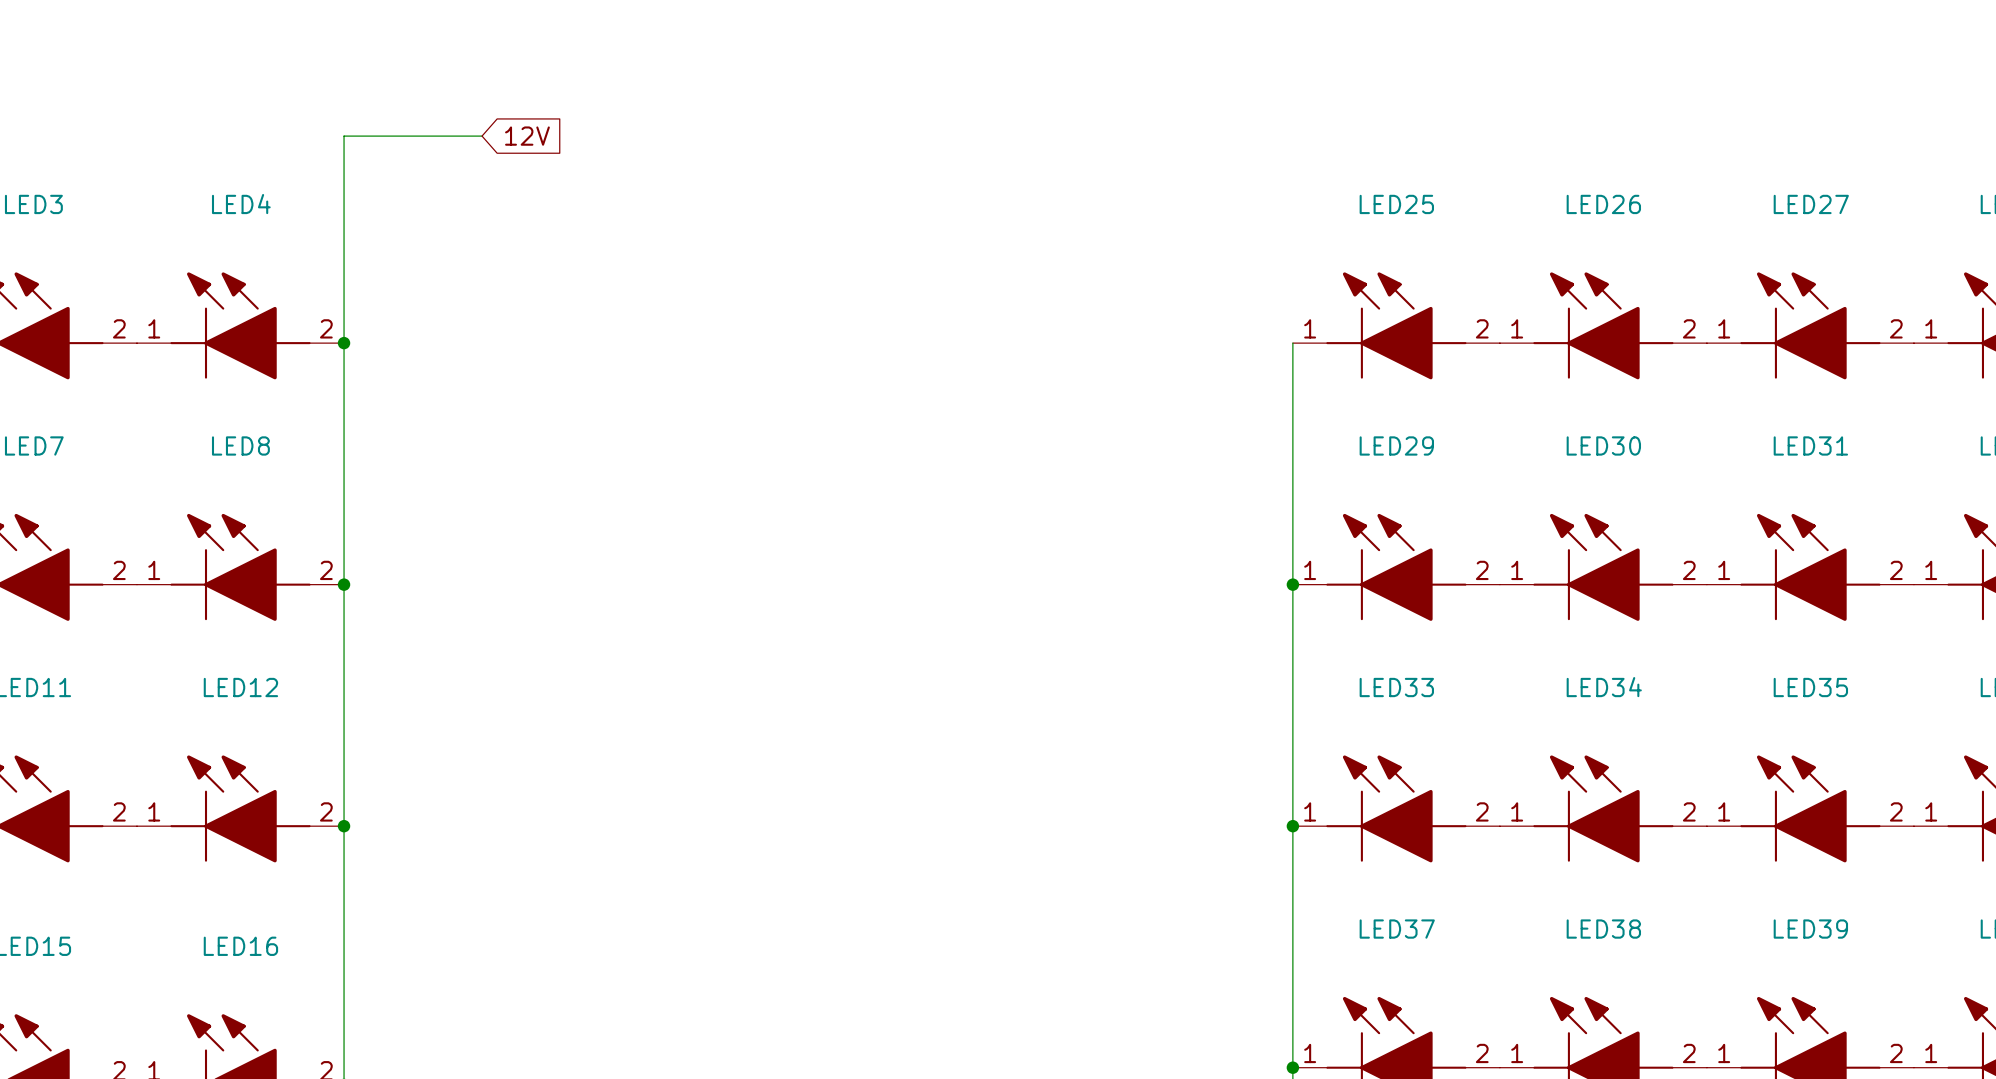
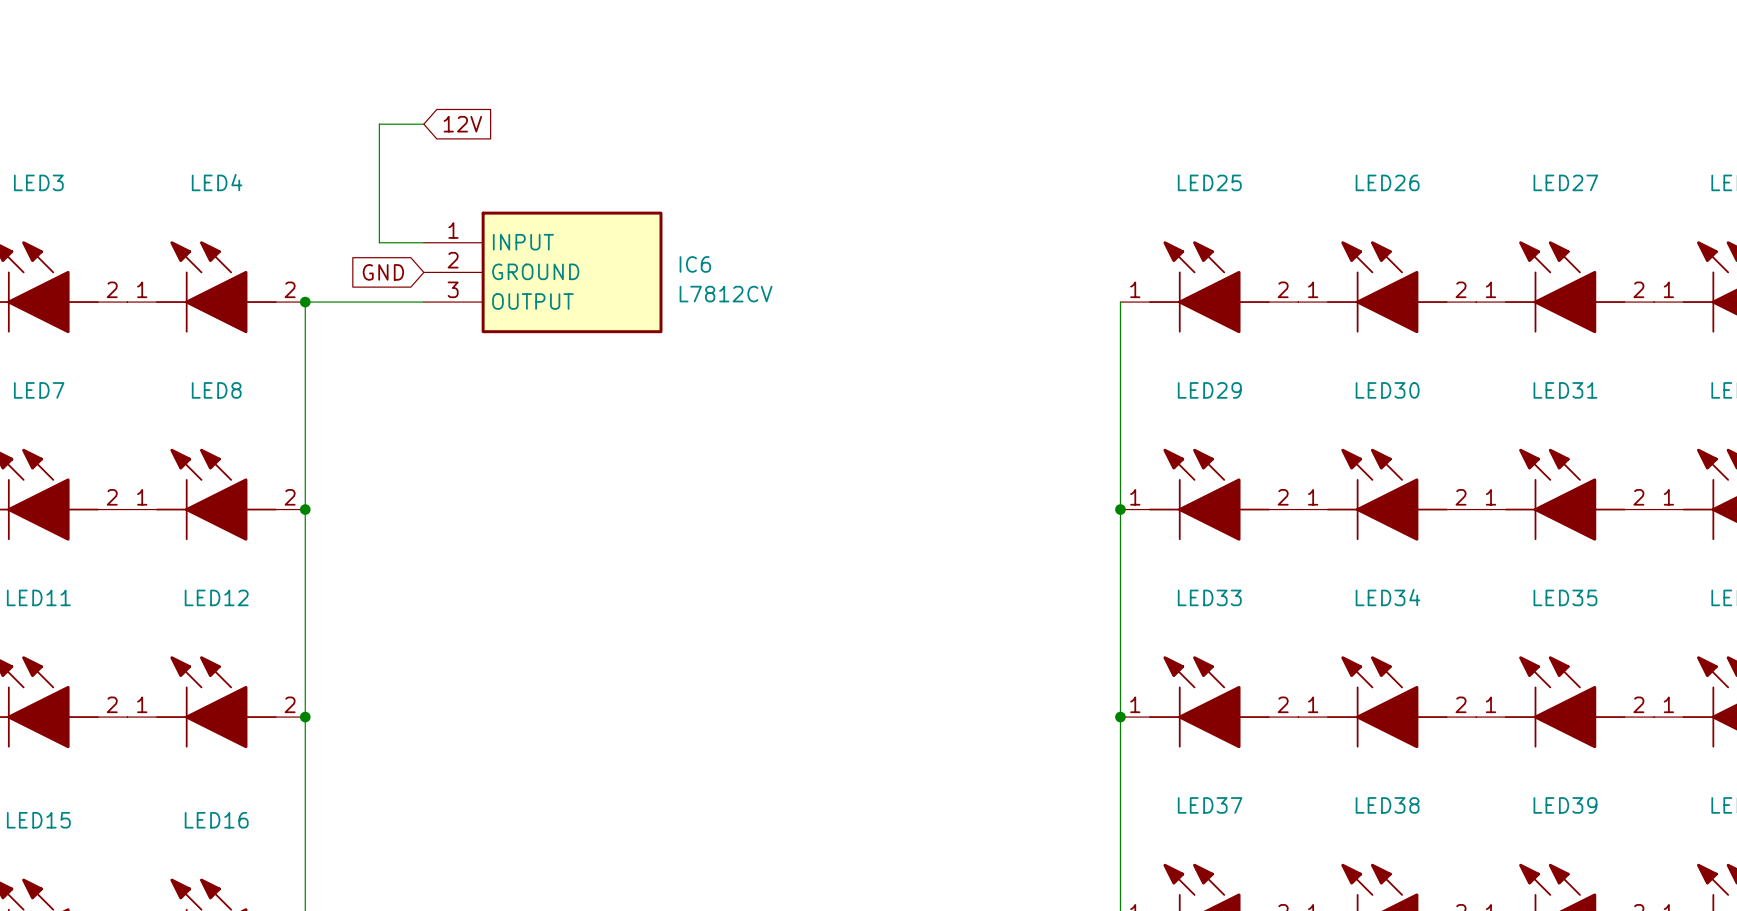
wire: (430, 136) (344, 136) (344, 343) -> (379, 124) (379, 242) (423, 242)
global label: none -> GND (383, 272)
IC6: none -> L7812CV (543, 272)
wire: none -> (305, 302) (423, 302)

